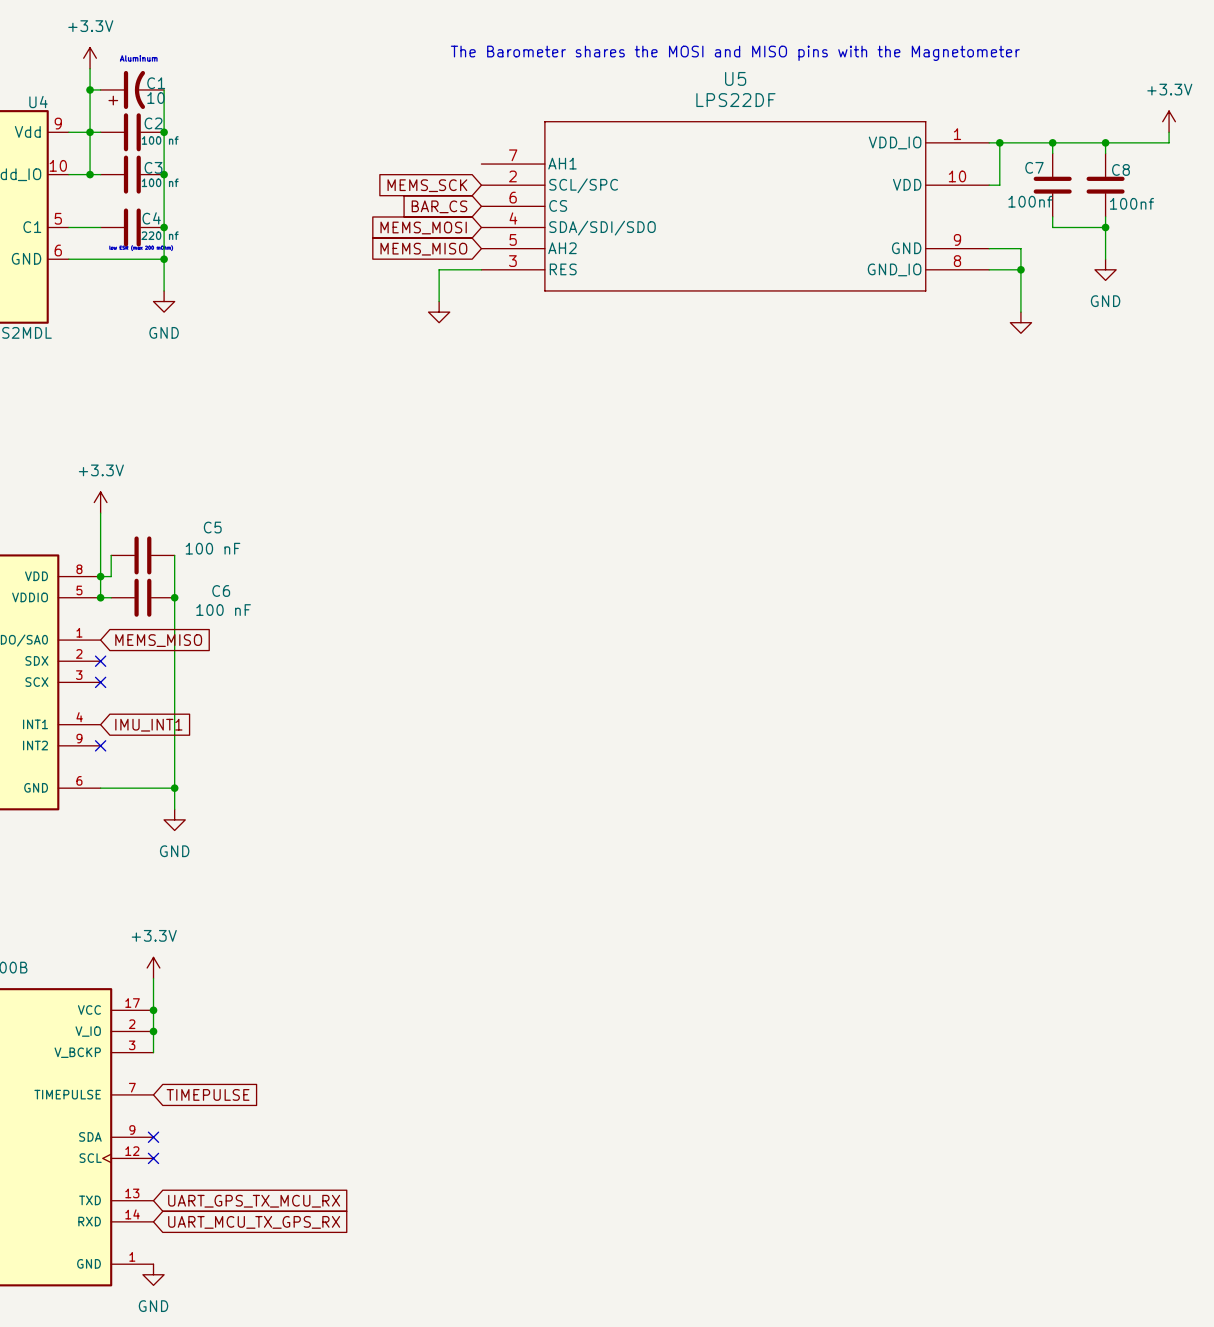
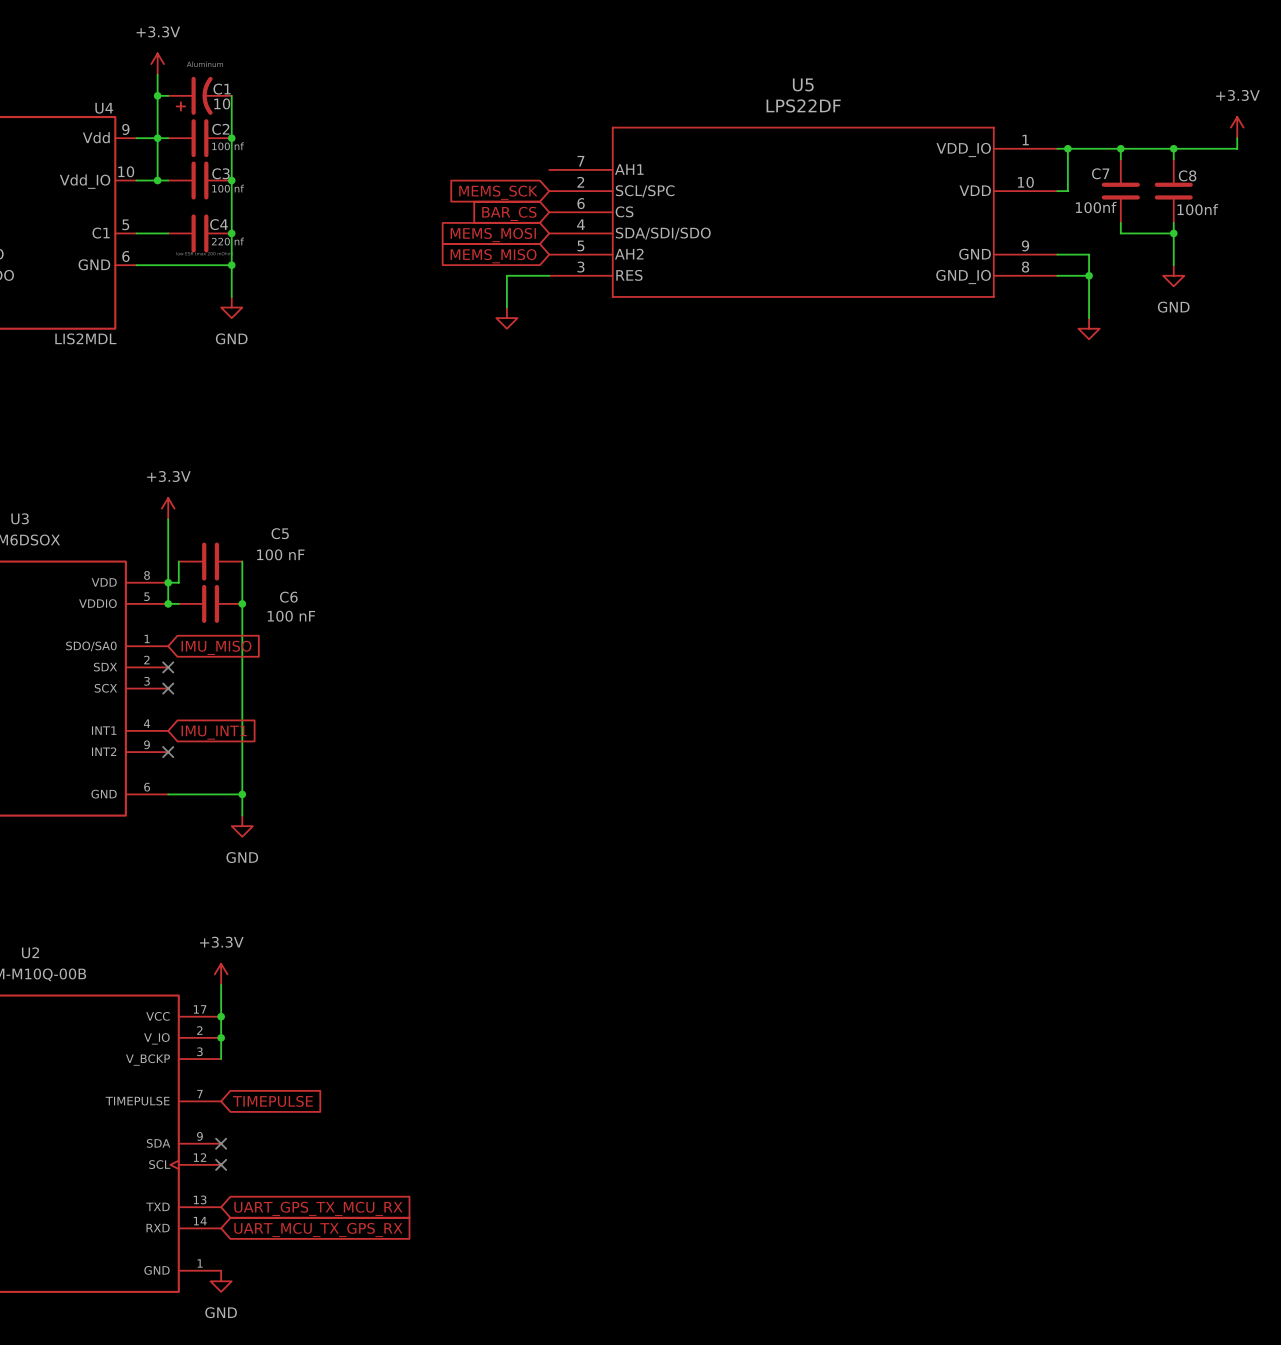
text: The Barometer shares the MOSI and MISO pins with the Magnetometer (735, 53) -> none
global label: MEMS_MISO (158, 640) -> IMU_MISO (216, 647)

